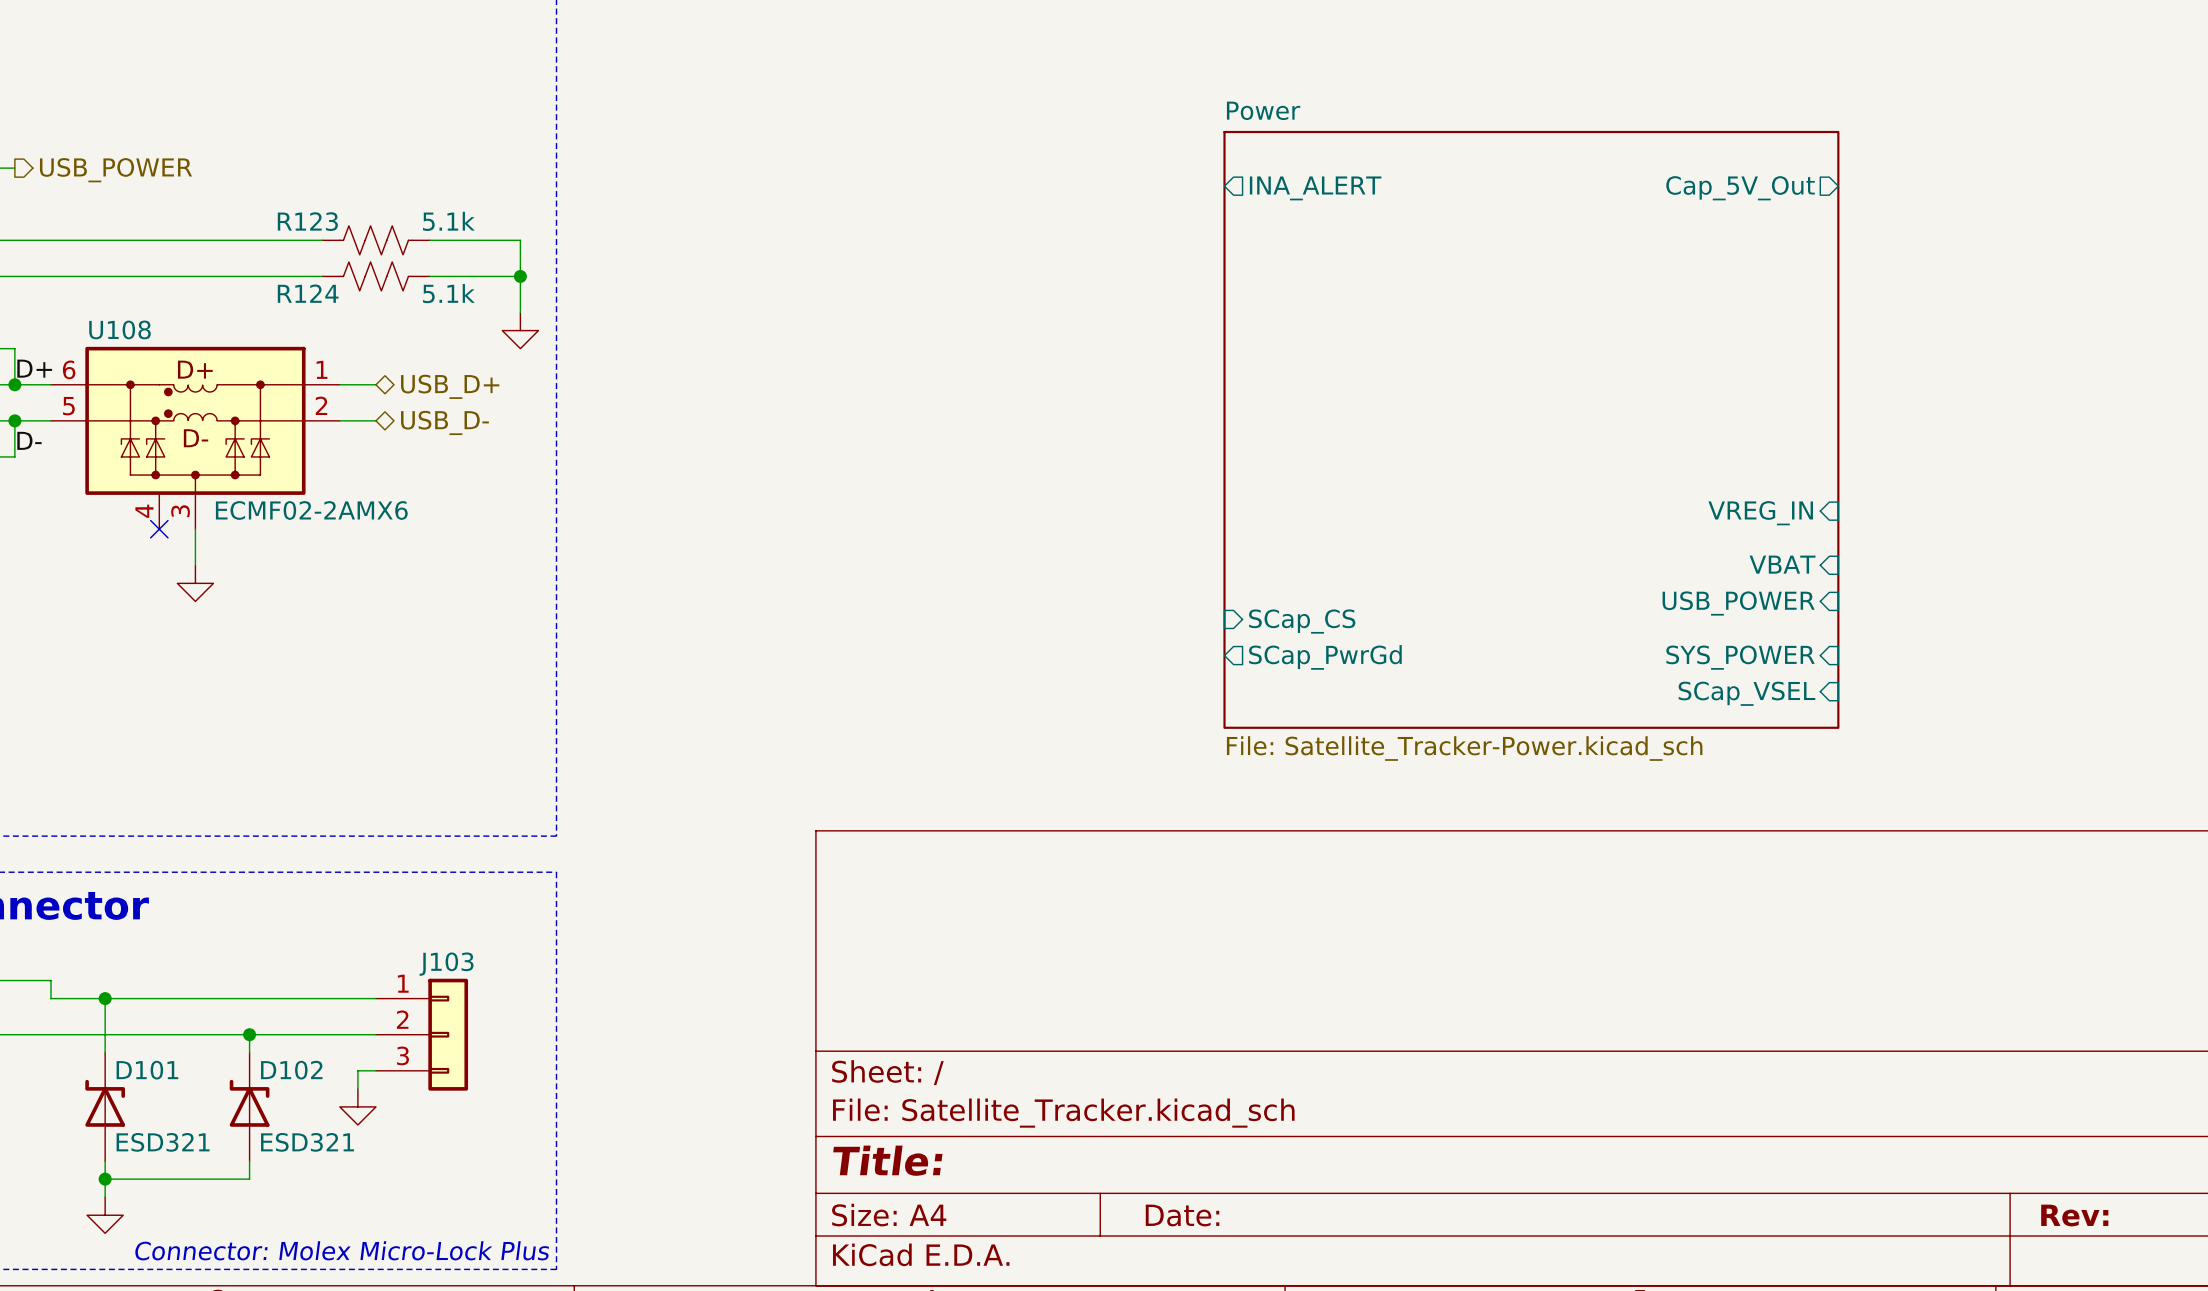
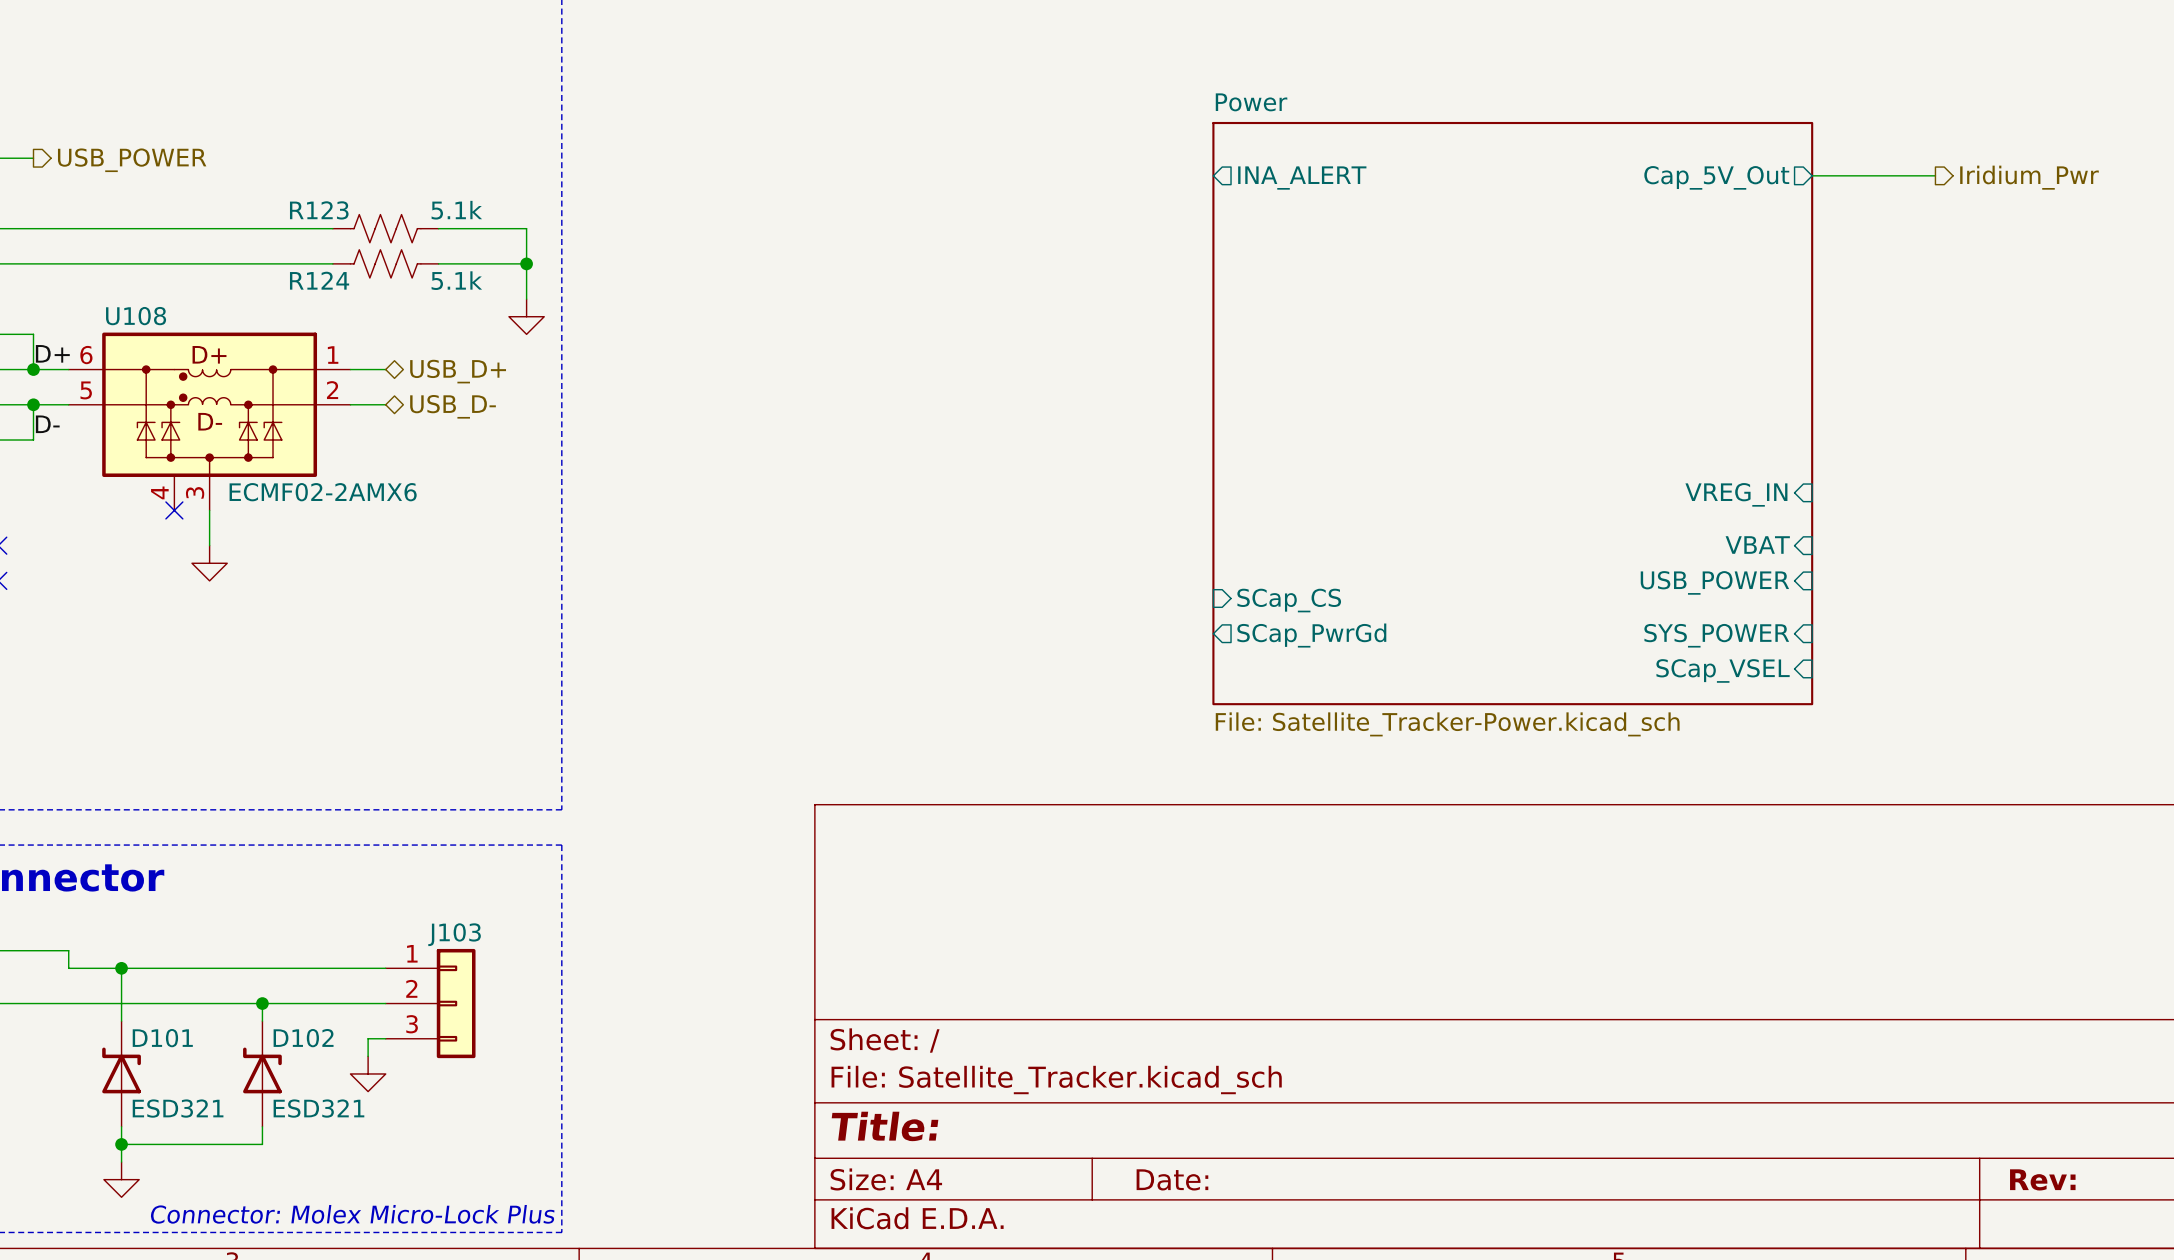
wire: none -> (1812, 175) (1935, 175)
hierarchical label: none -> Iridium_Pwr (2029, 177)

